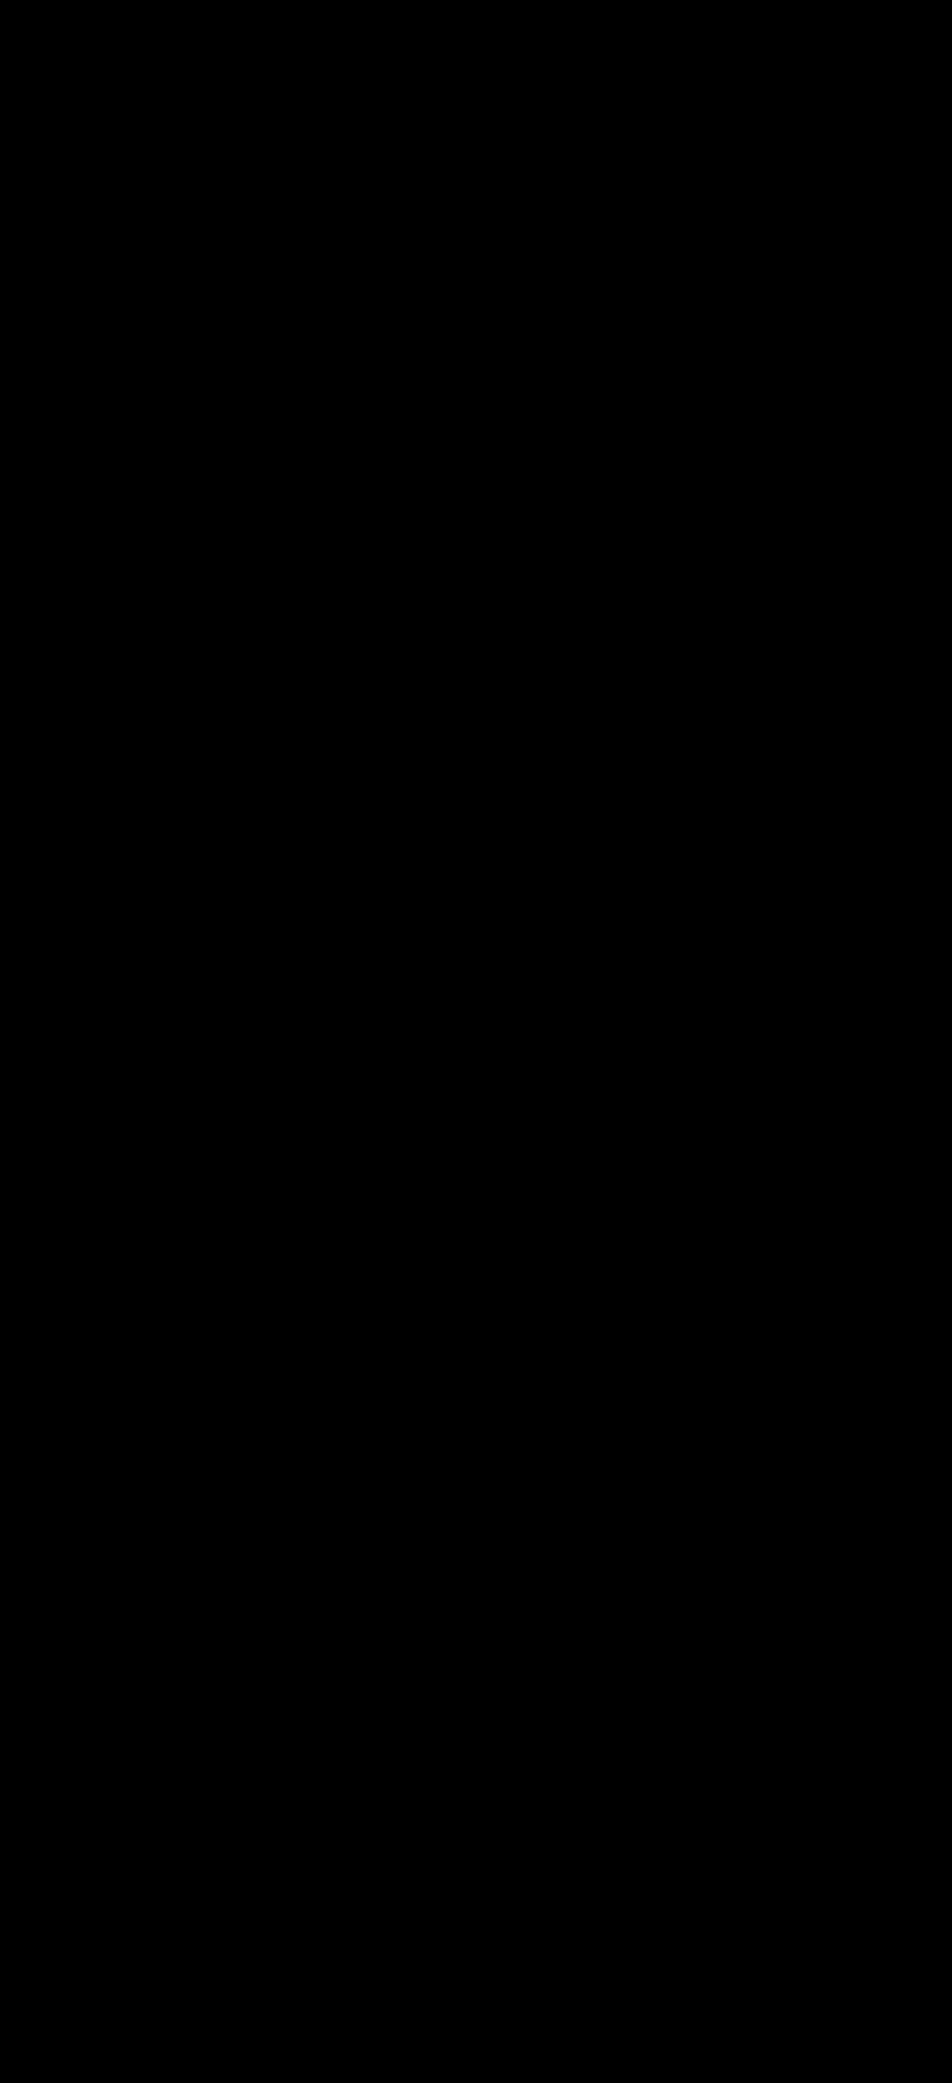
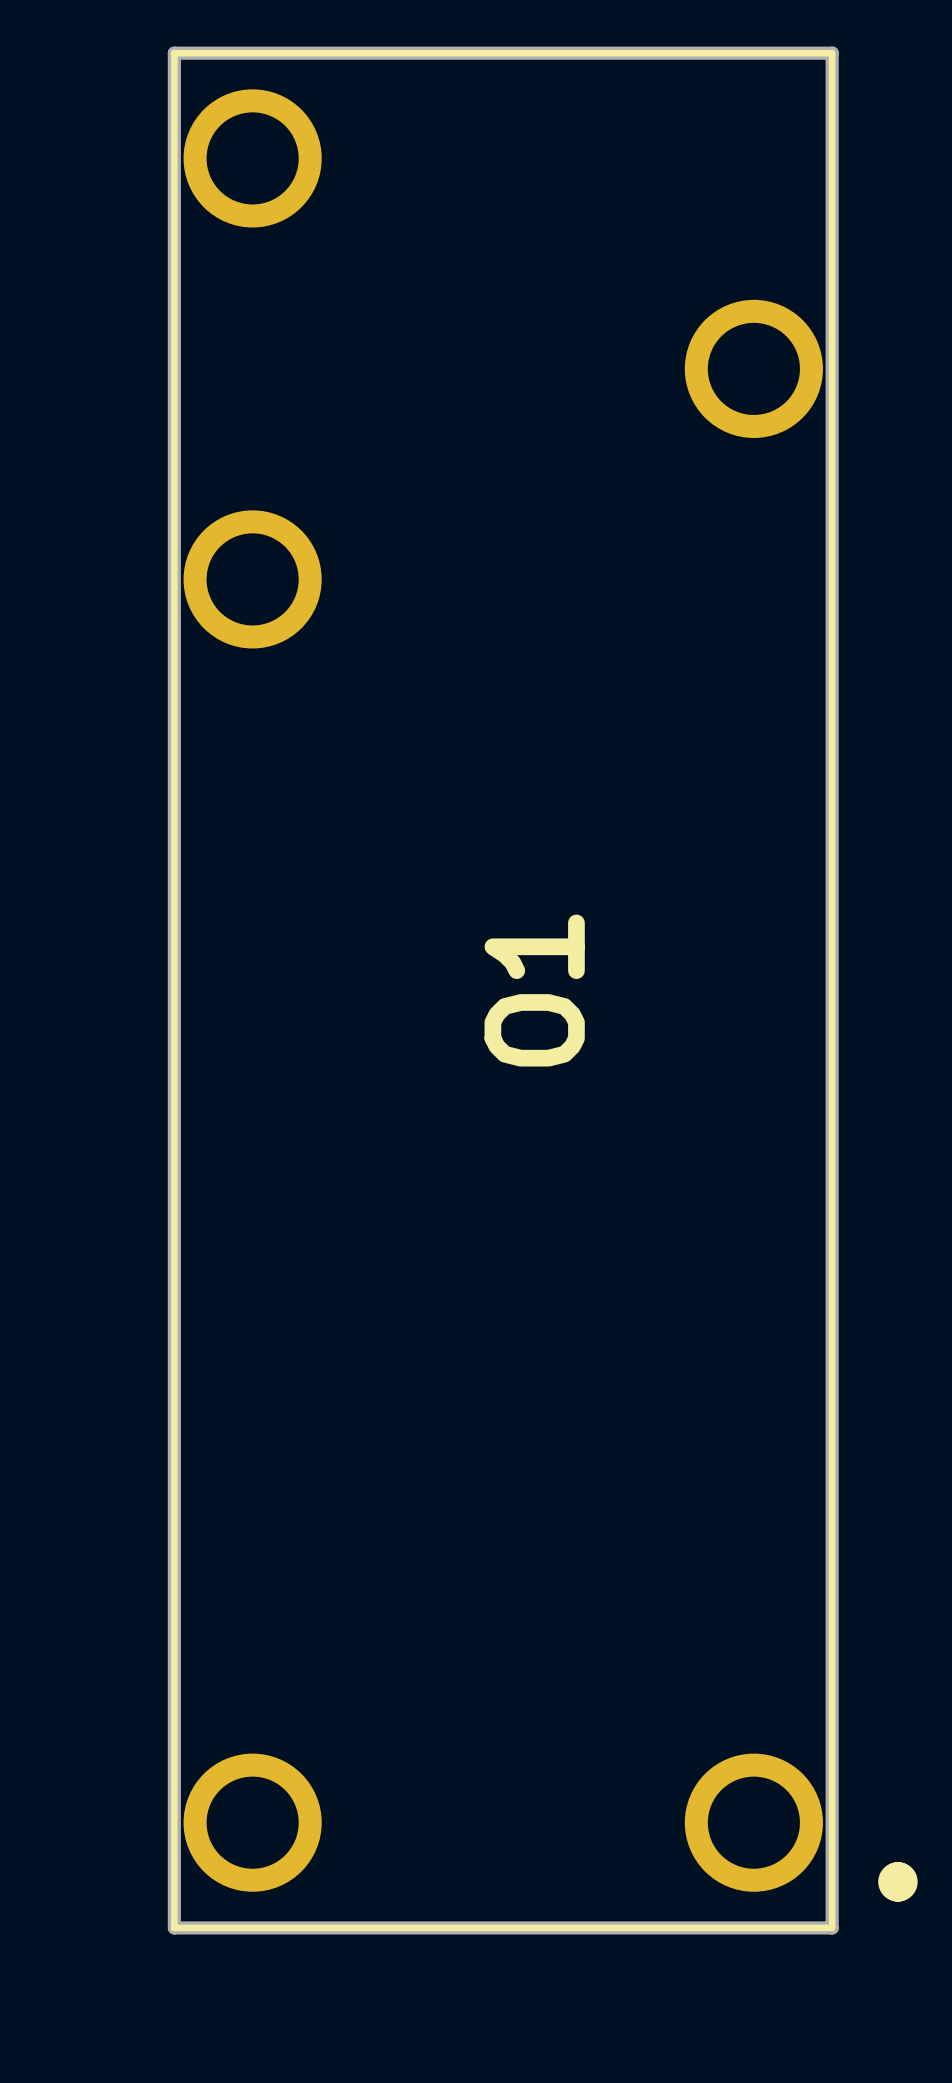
O1: none -> (542, 990)

